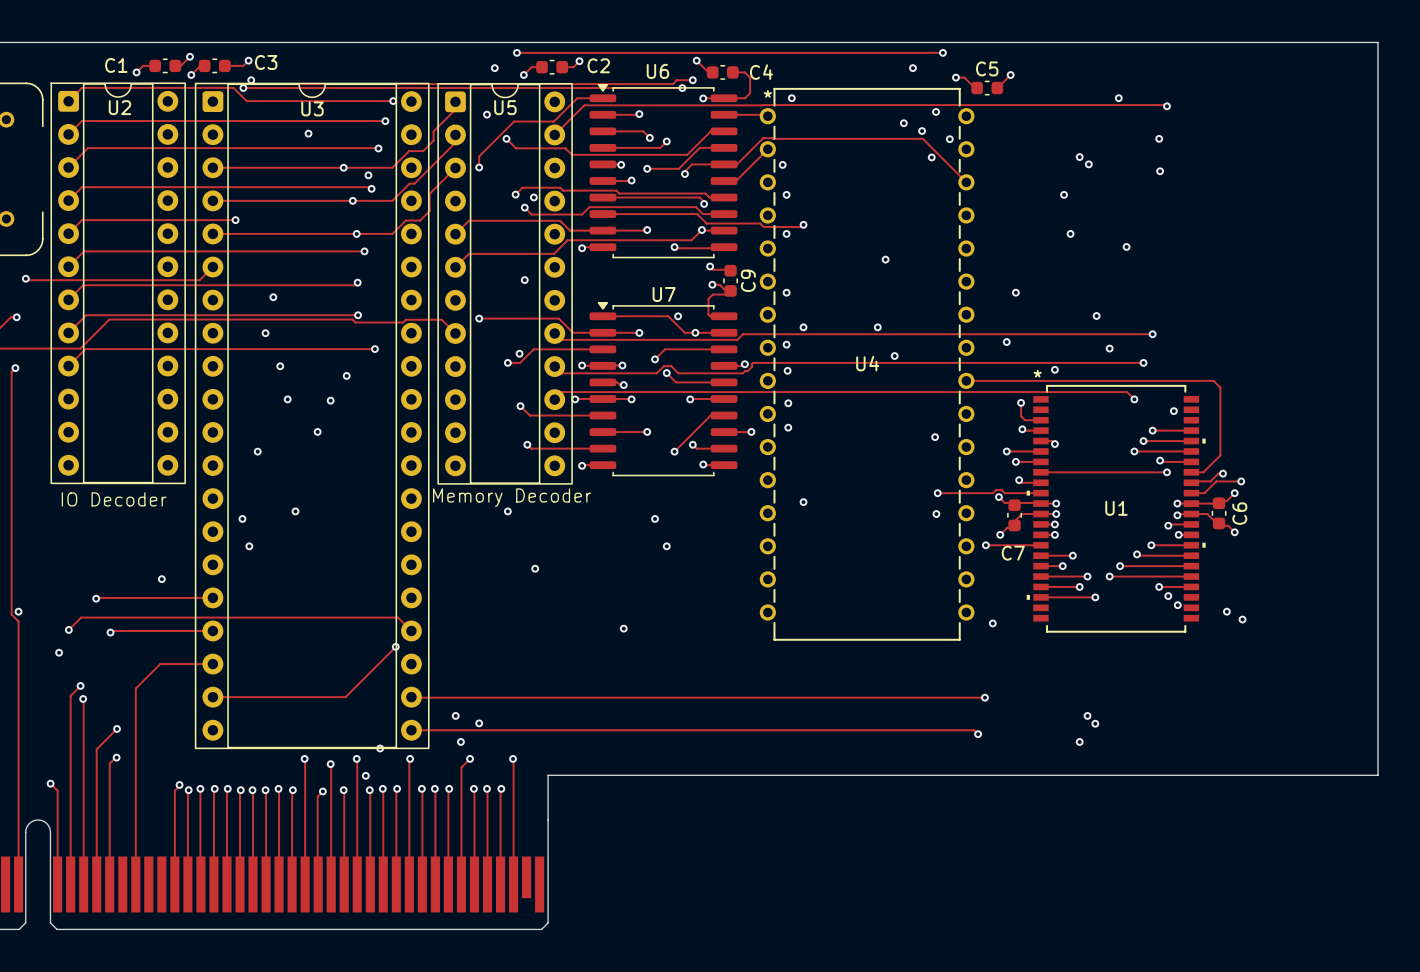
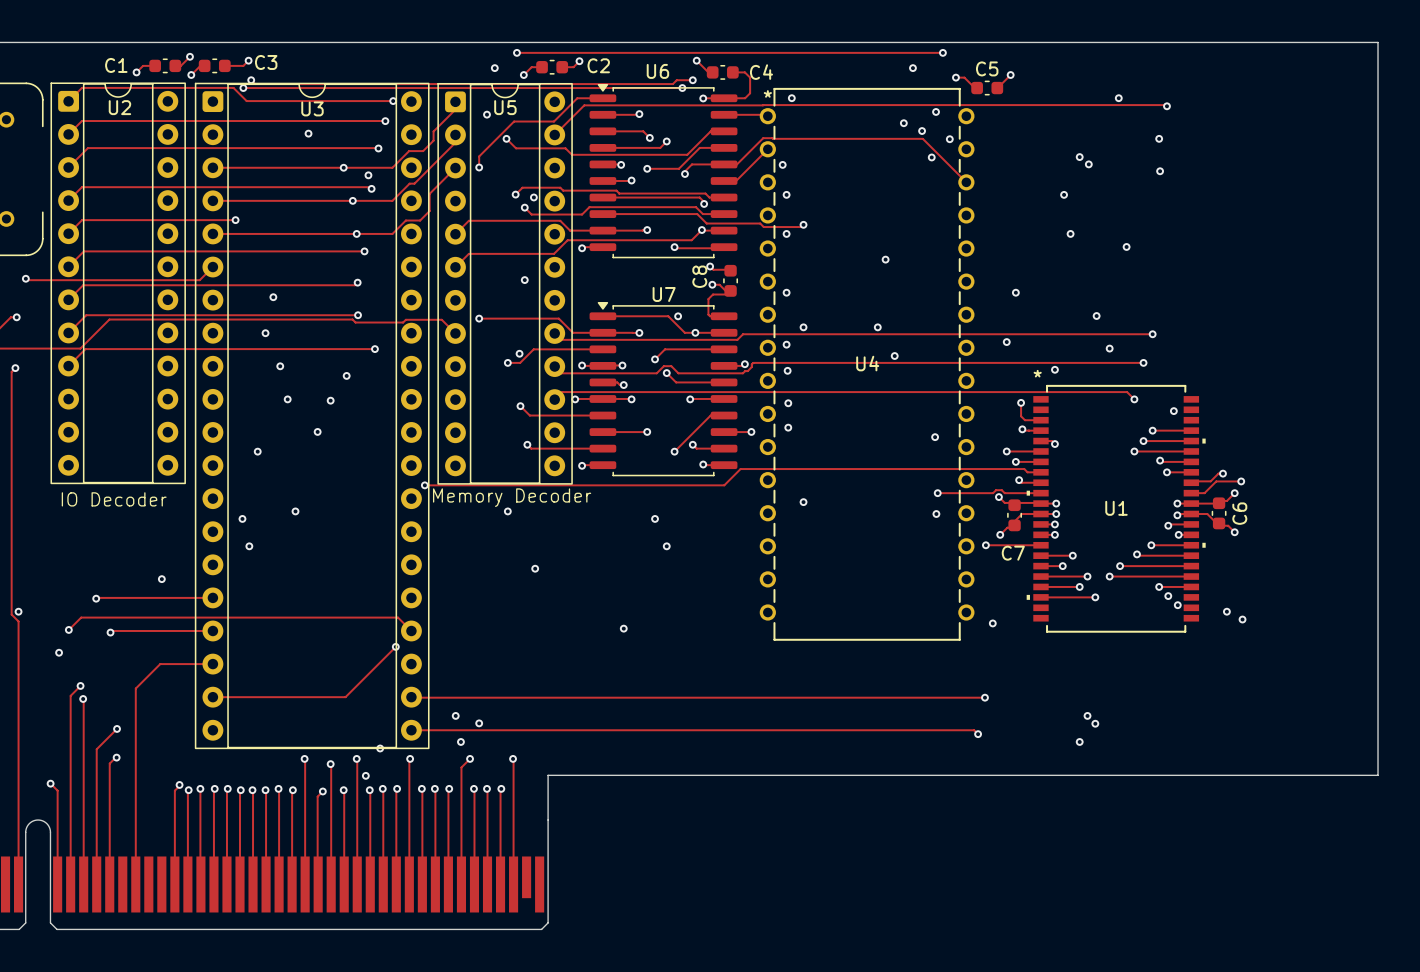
C9 name: C9 (748, 280) -> C8 (699, 276)
track: (966, 380) (1213, 380) (1220, 387) (1220, 455) (1203, 472) (1191, 472) -> none
track: (1040, 472) (1166, 472) -> (1191, 472) (1166, 472)
track: none -> (1040, 472) (1027, 472) (1024, 469) (740, 469) (724, 485) (424, 485)
via: none -> (424, 485)

